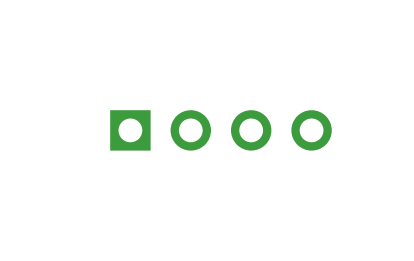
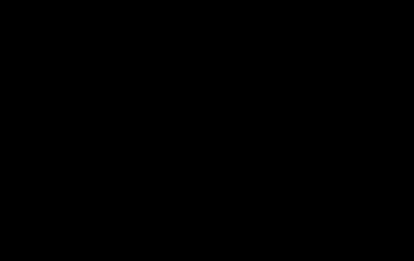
part: (220, 130) -> none

